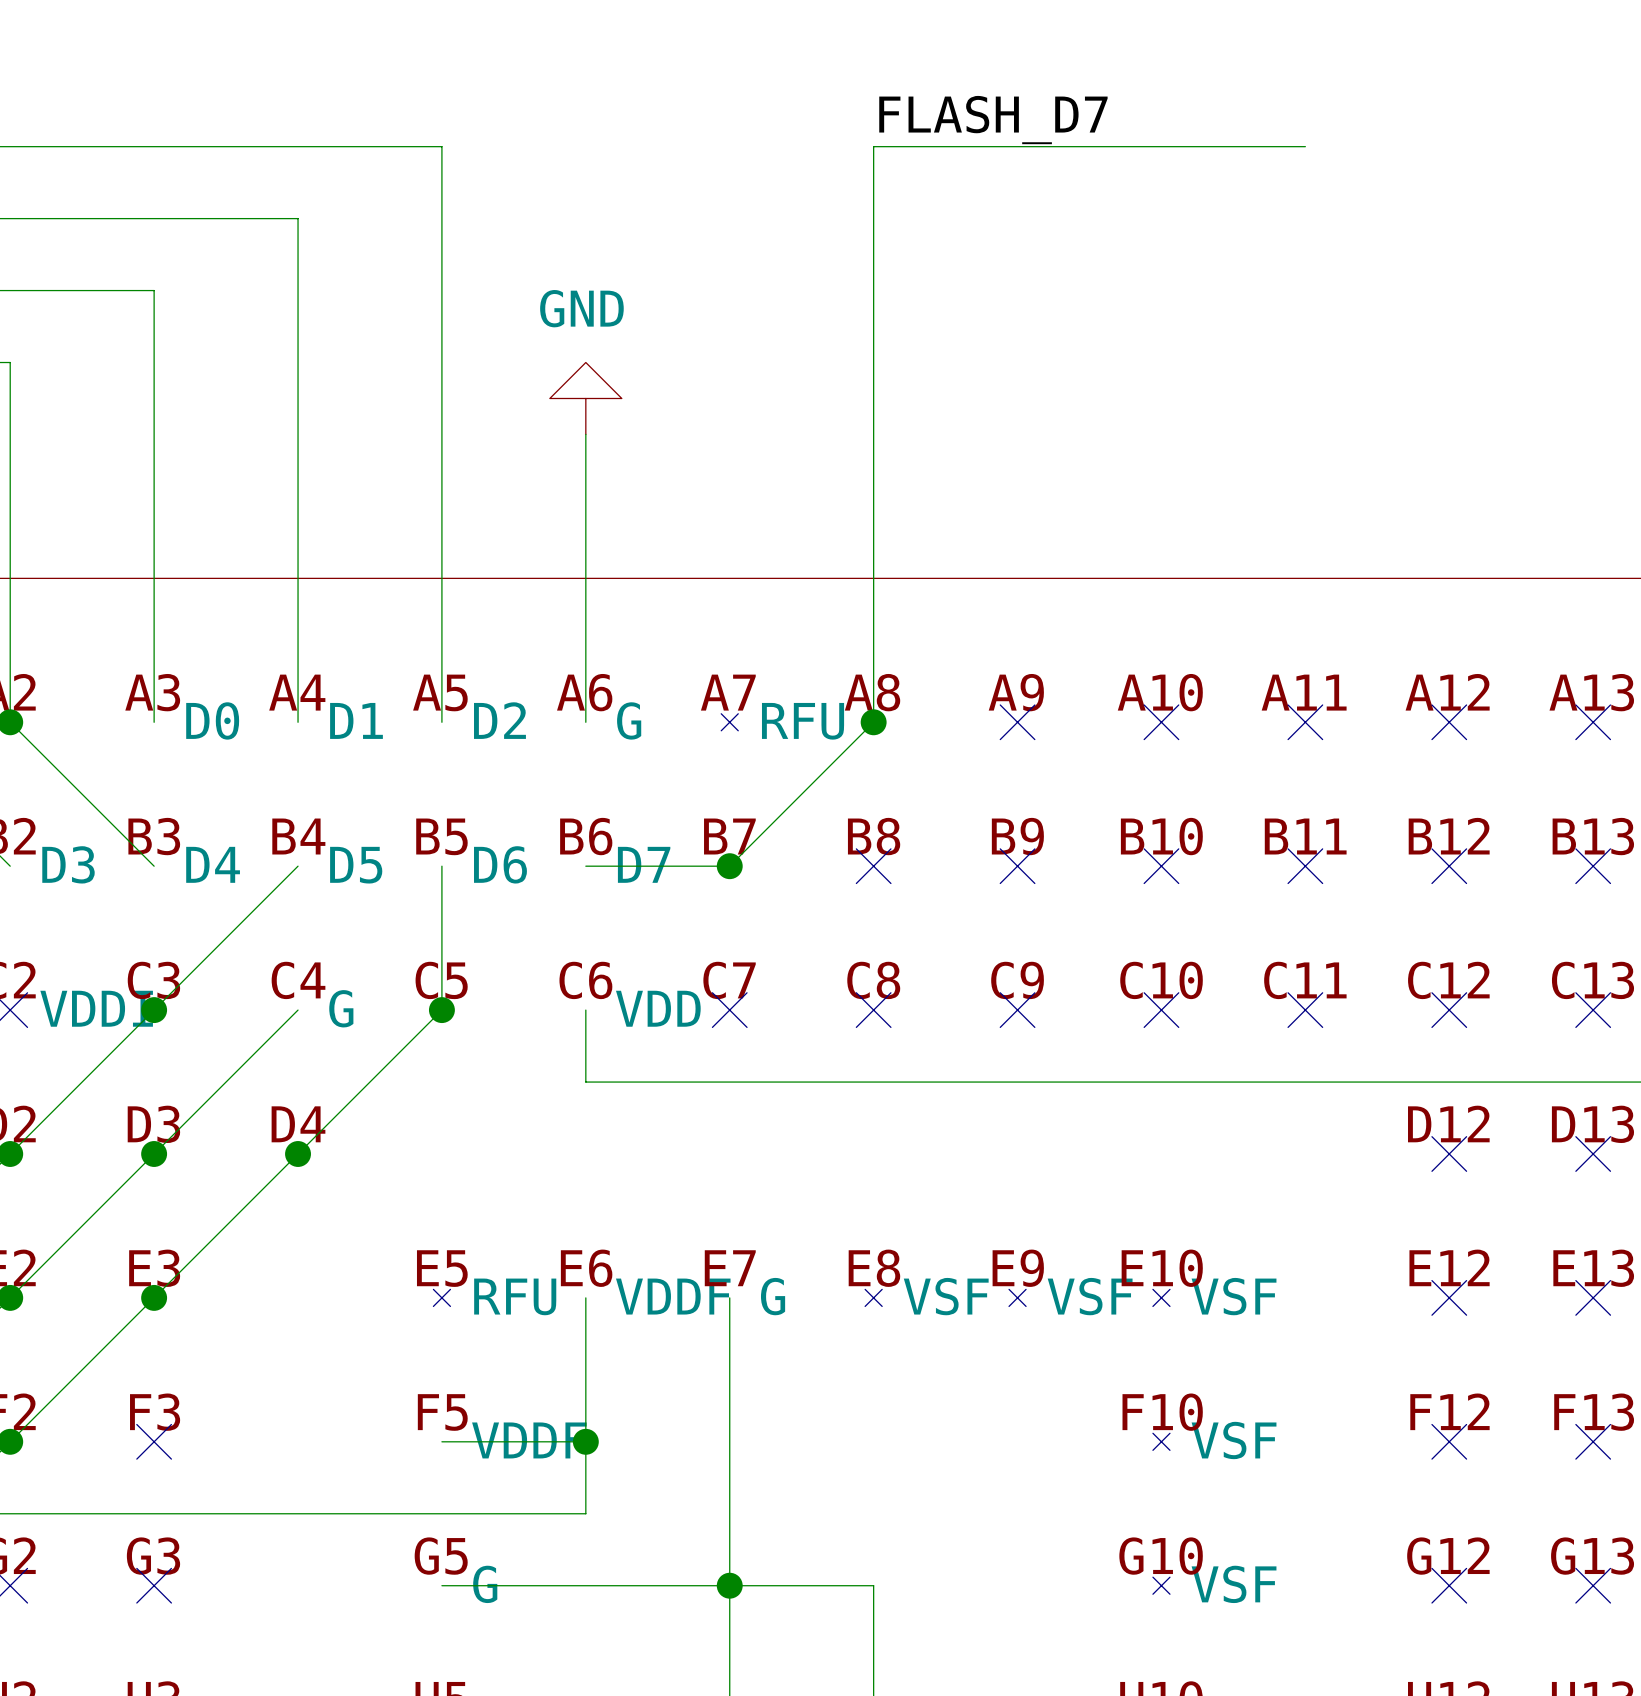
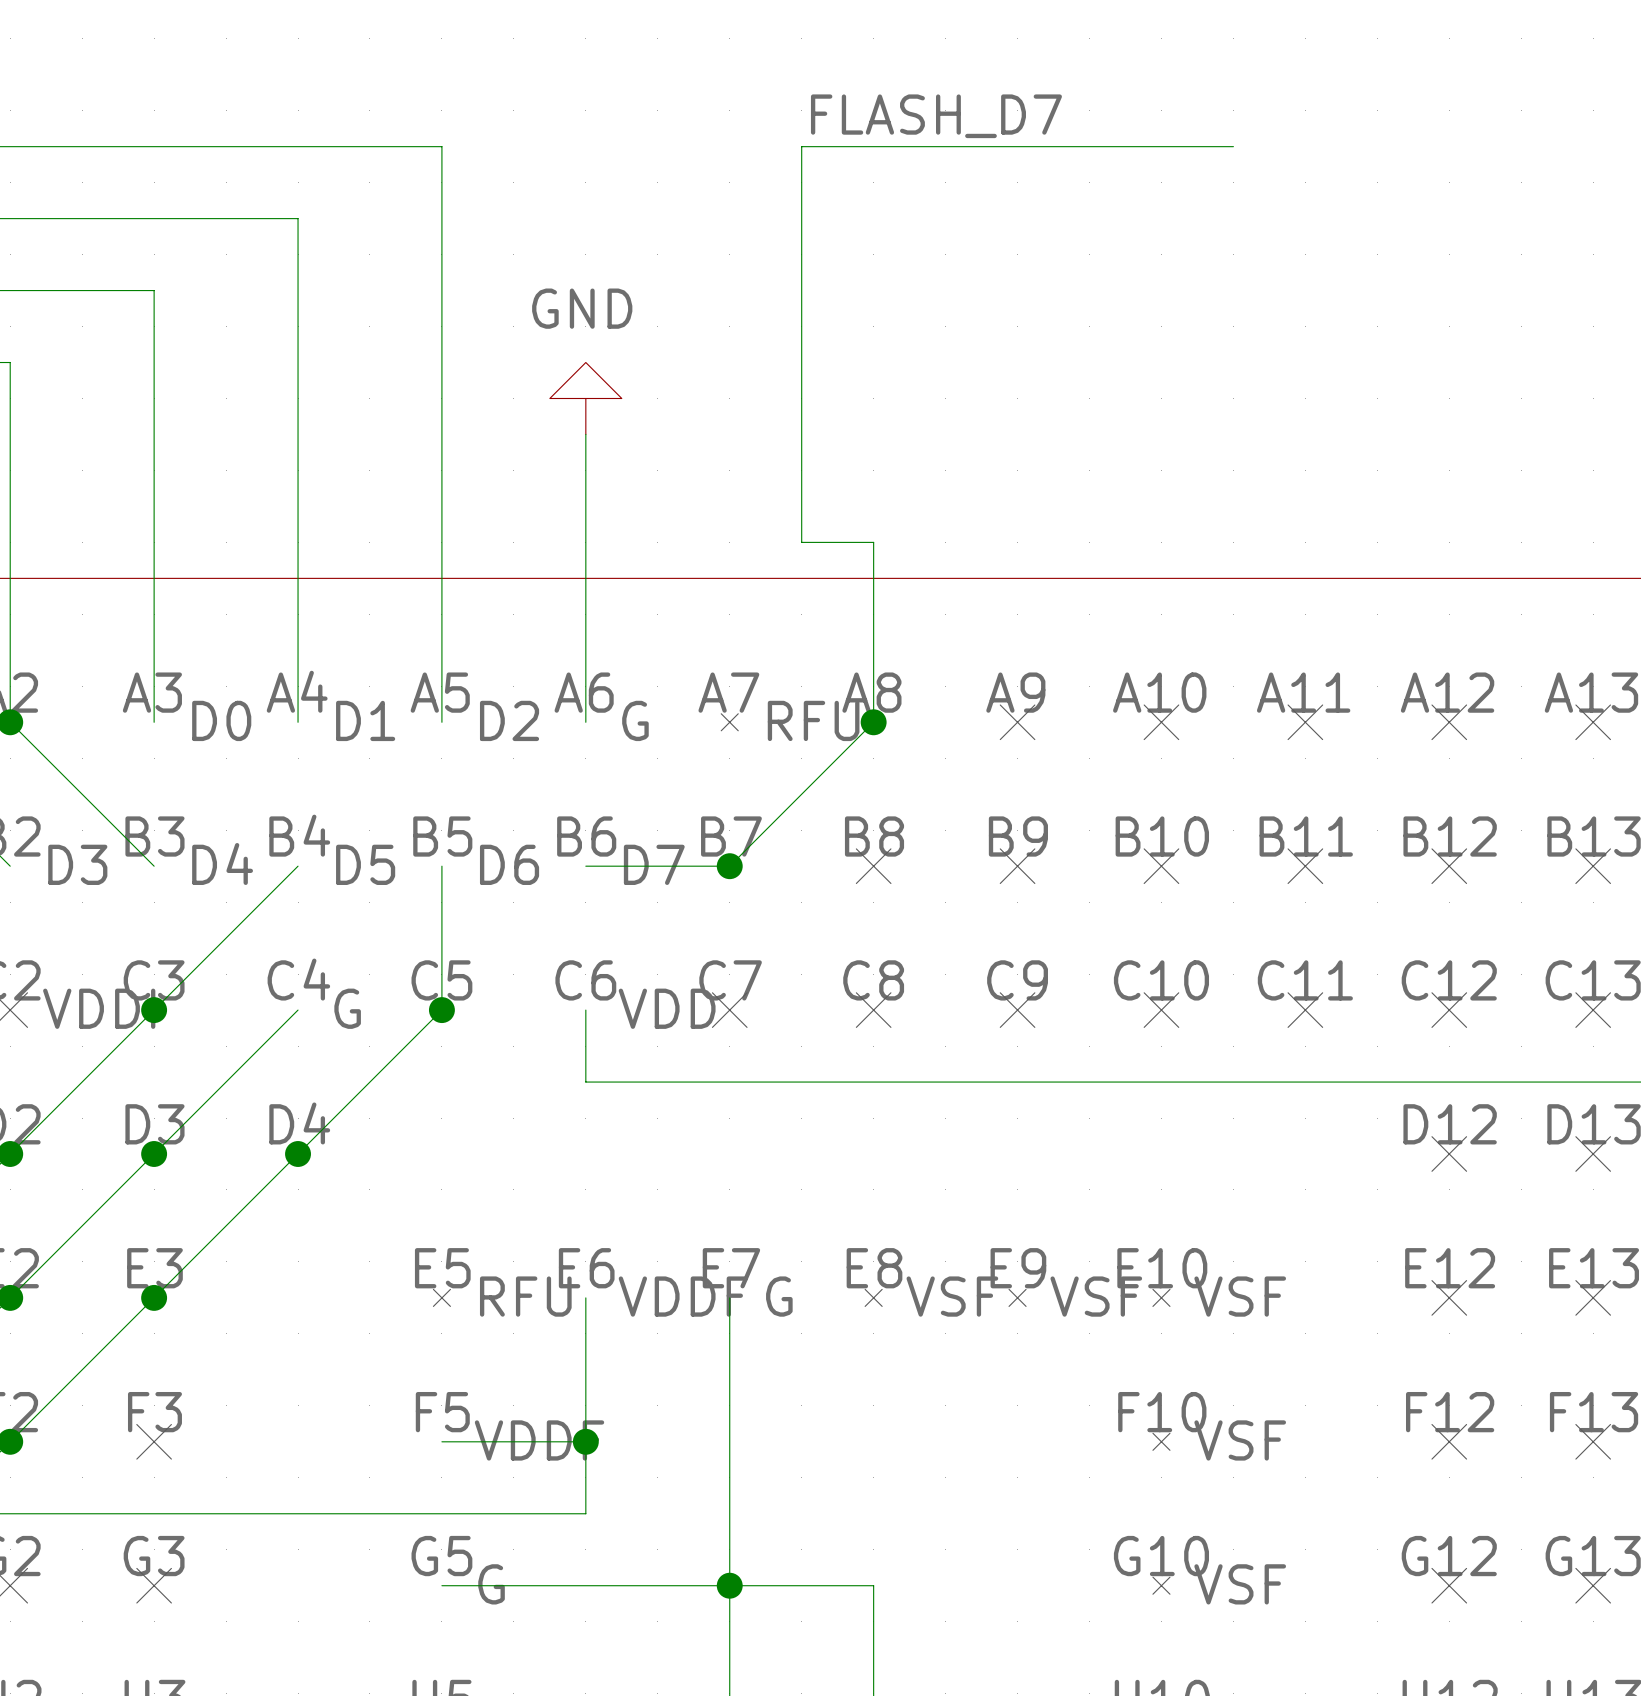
label position: FLASH_D7 (993, 120) -> FLASH_D7 (936, 116)
wire: (873, 146) (873, 542) -> (873, 146) (801, 146) (801, 542) (873, 542)
wire: (1233, 146) (1305, 146) -> none

